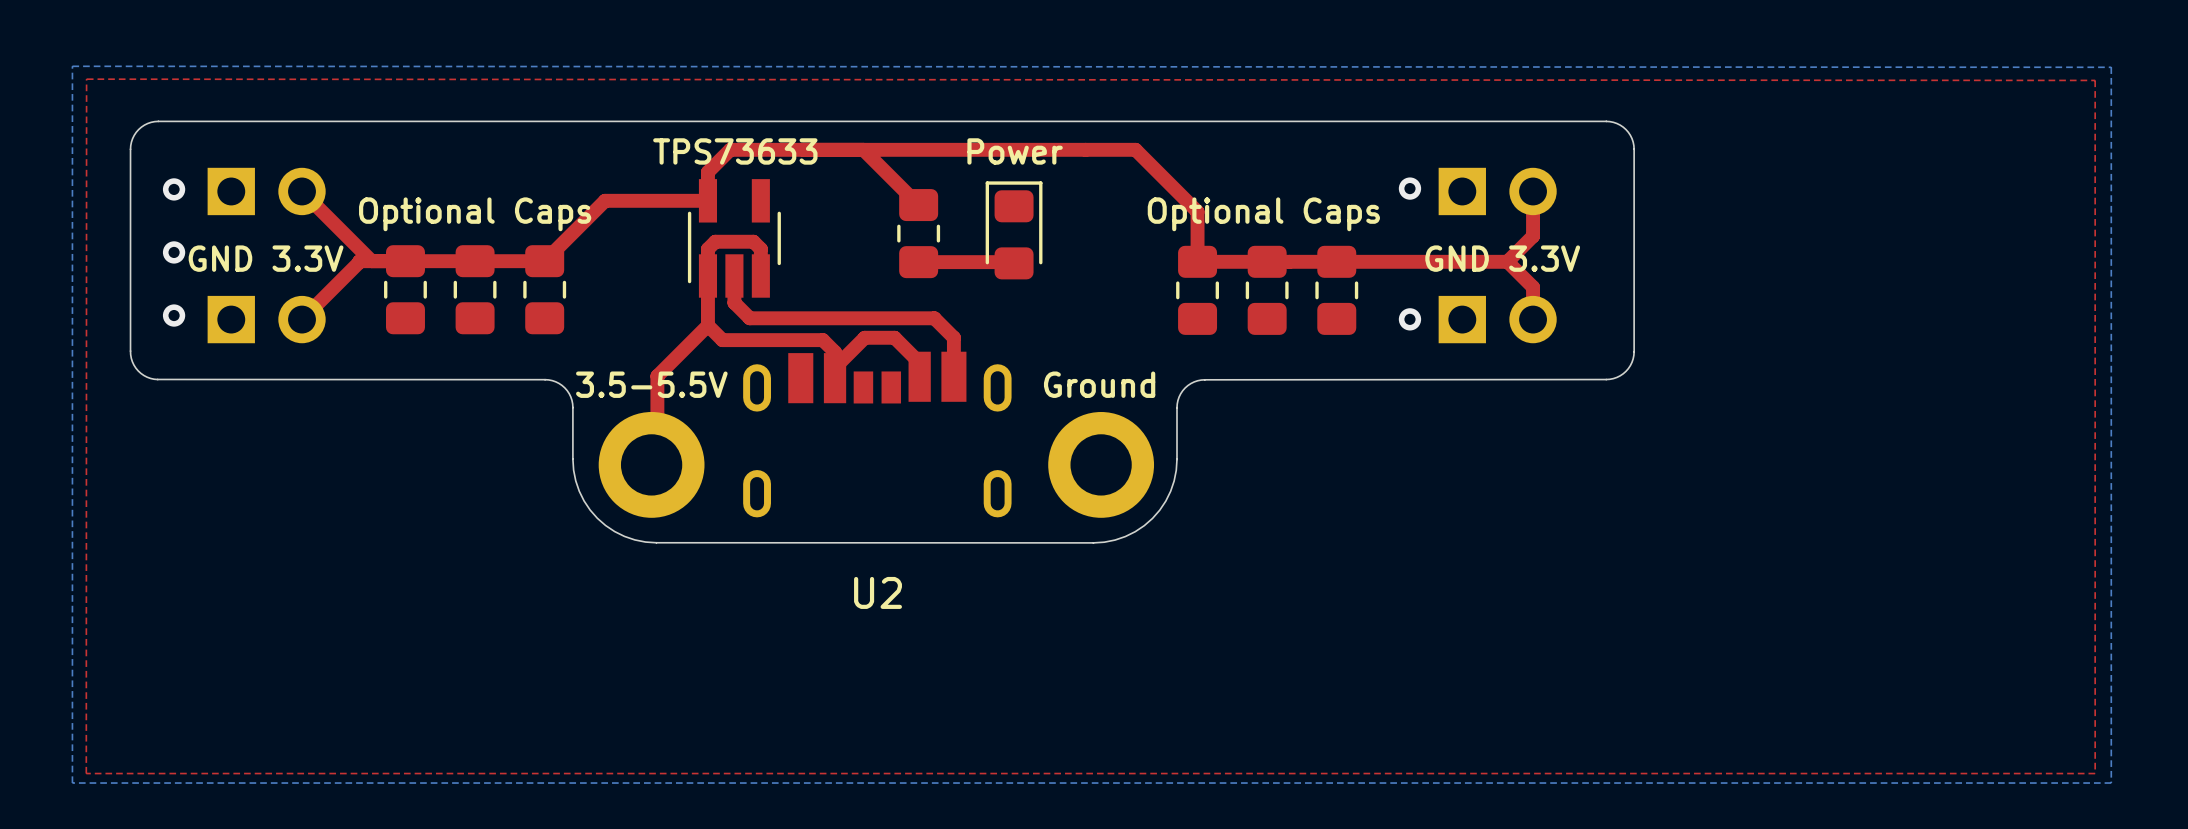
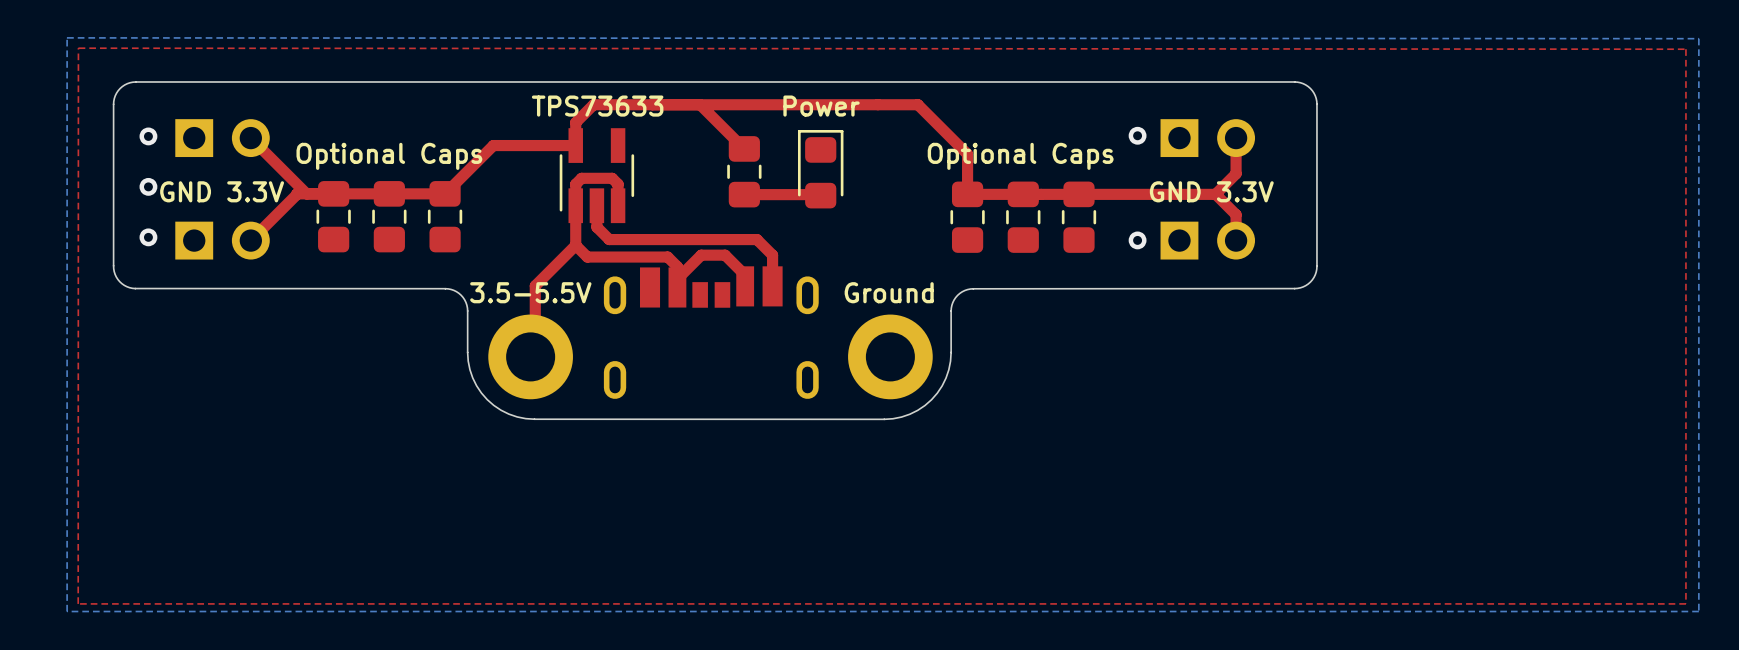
U2 name: U2 (878, 592) -> none

